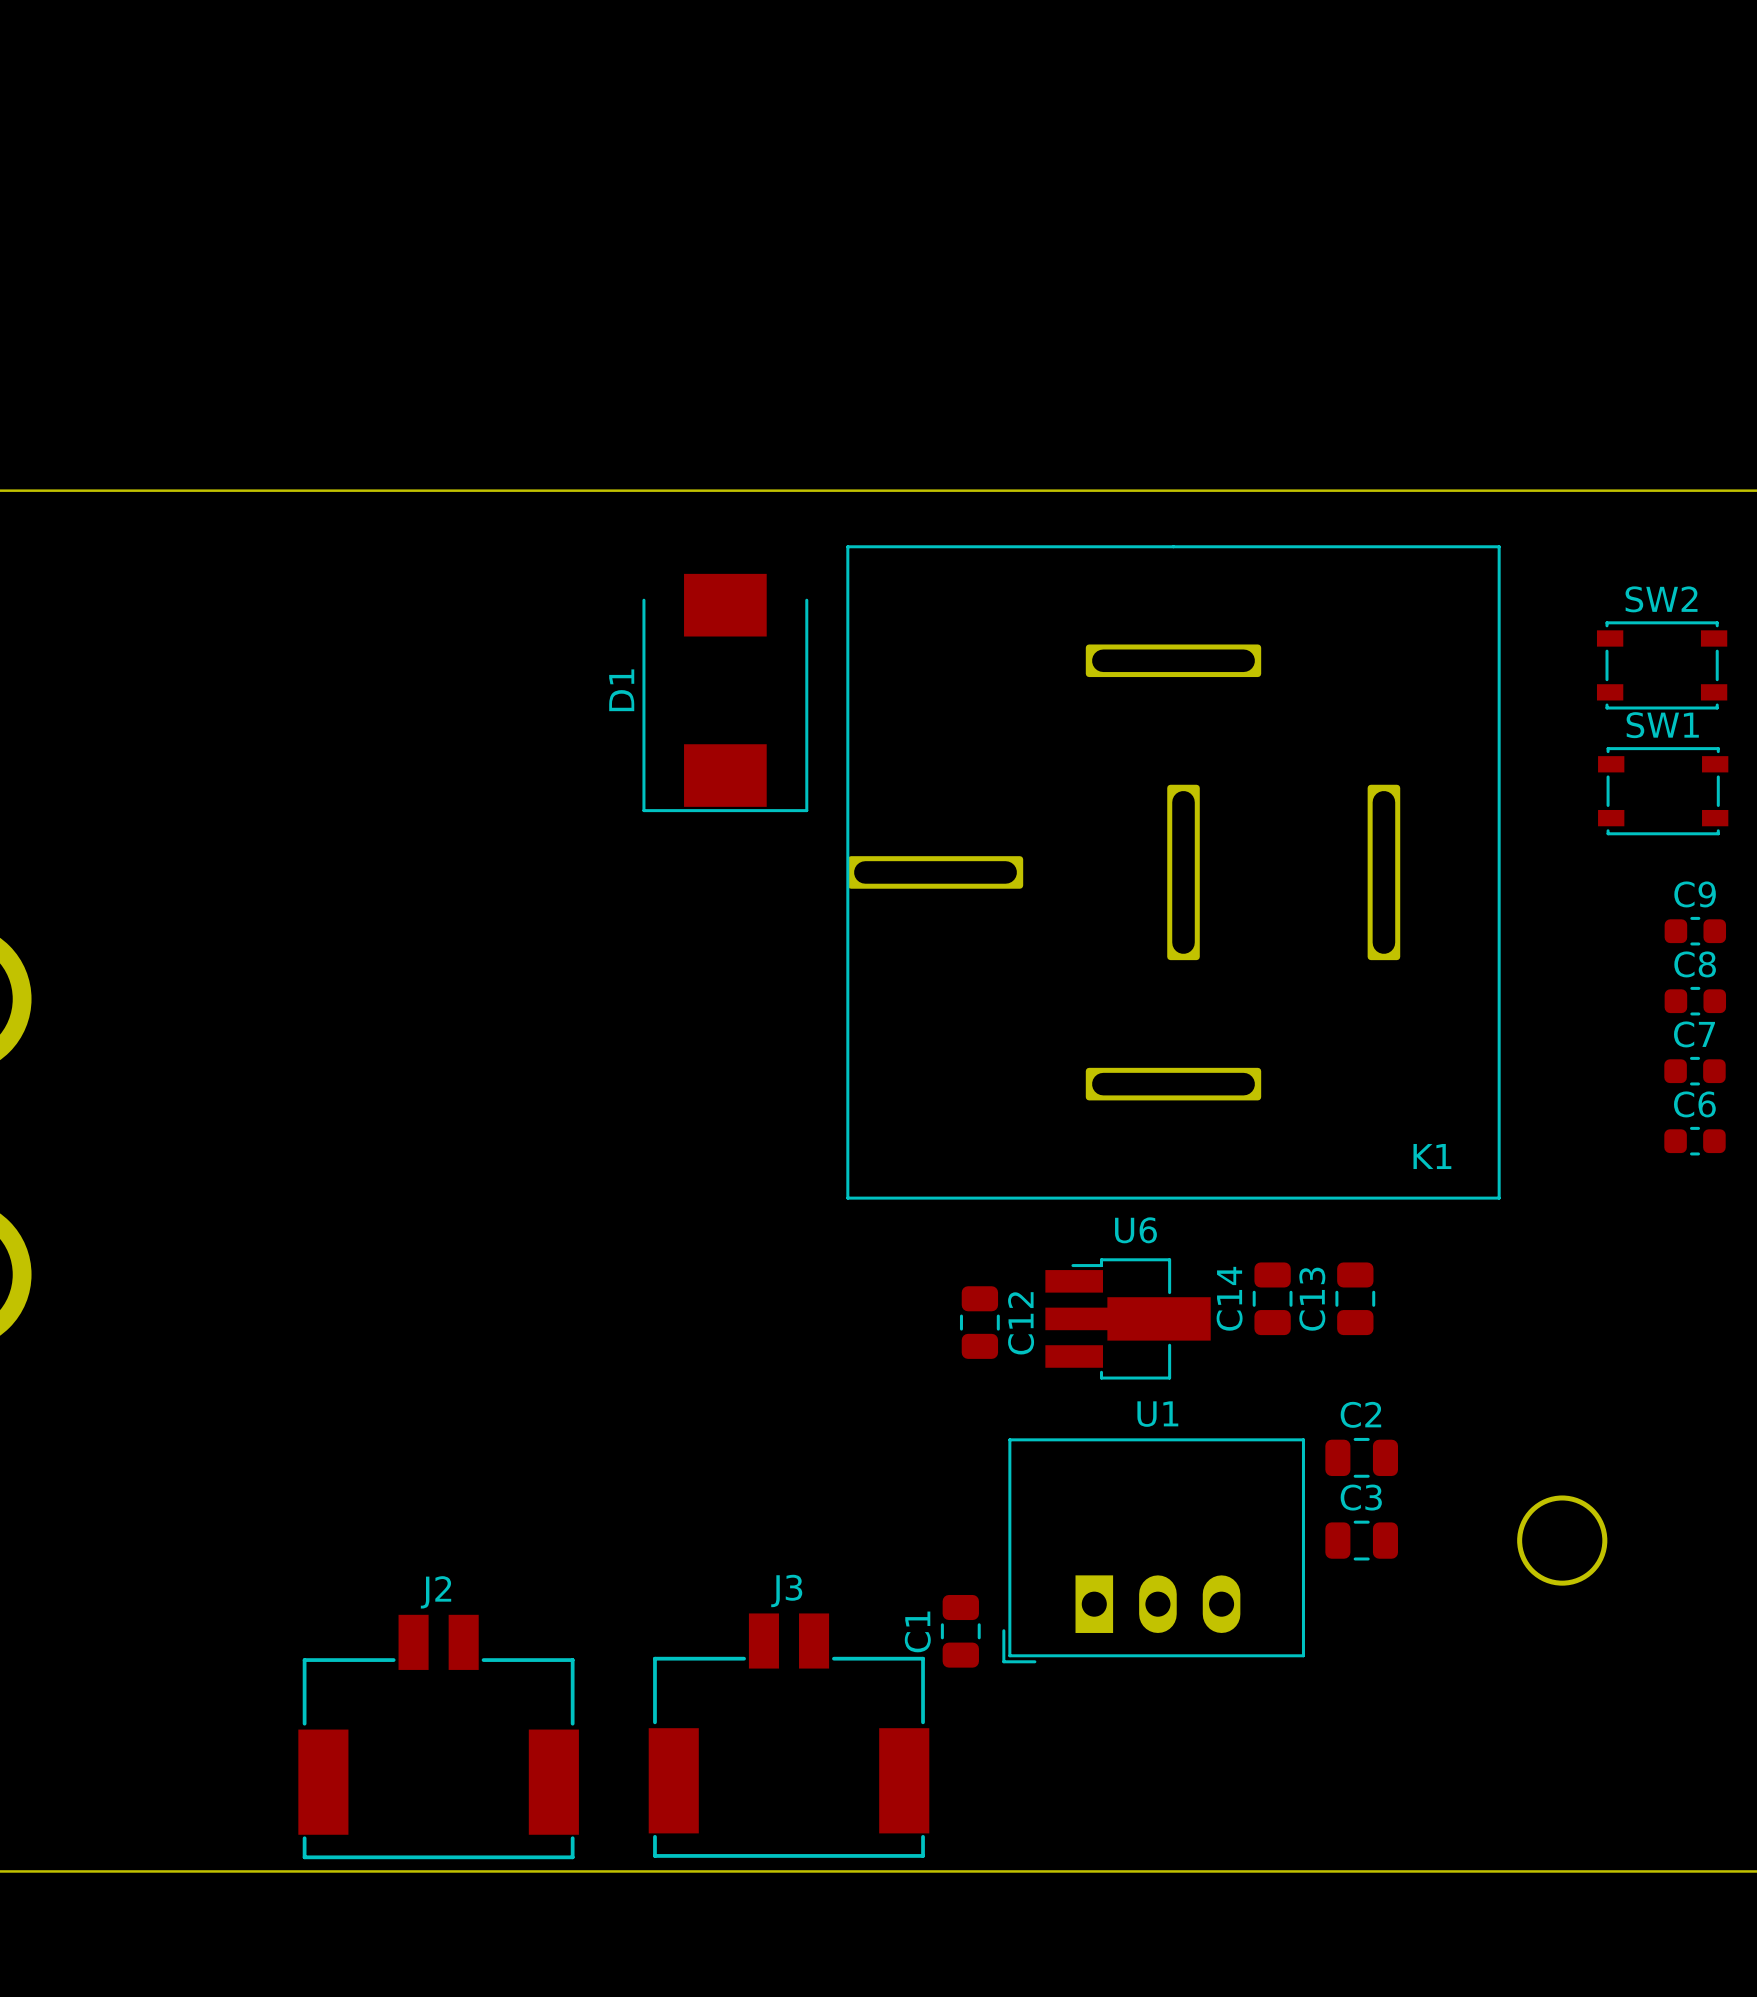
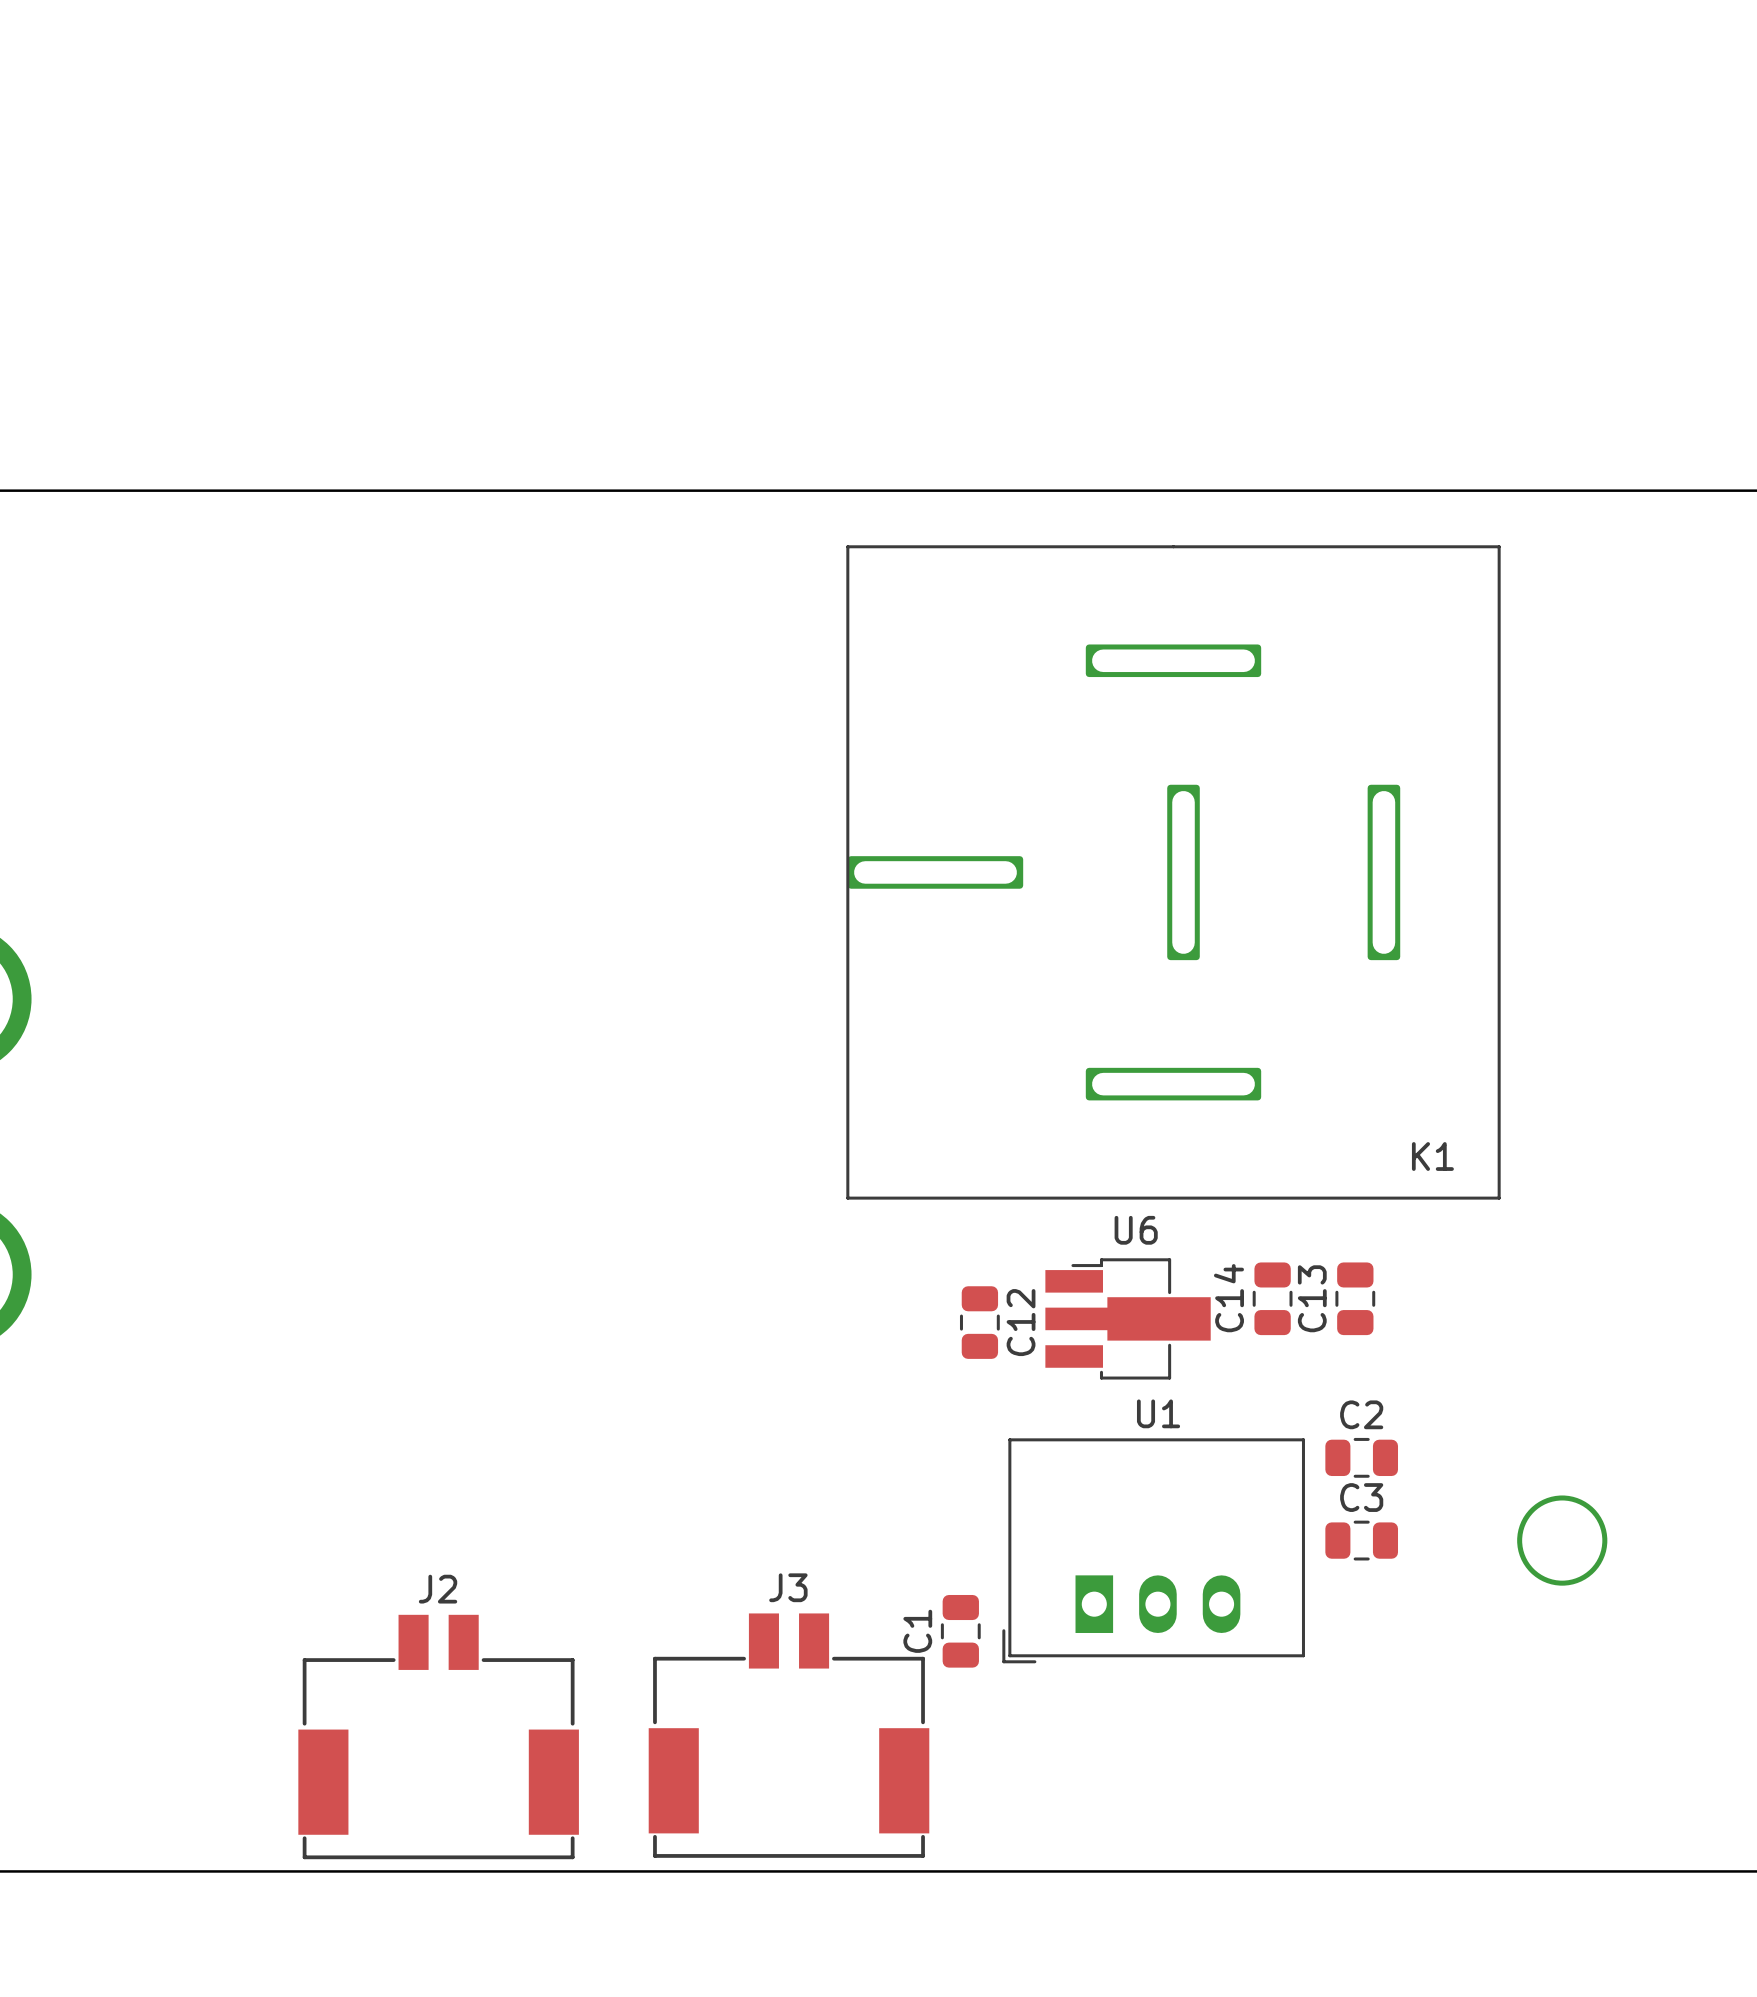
SW2: (1662, 665) -> none
D1: (725, 693) -> none
SW1: (1663, 791) -> none
C9: (1695, 931) -> none
C8: (1695, 1001) -> none
C7: (1695, 1071) -> none
C6: (1695, 1141) -> none

